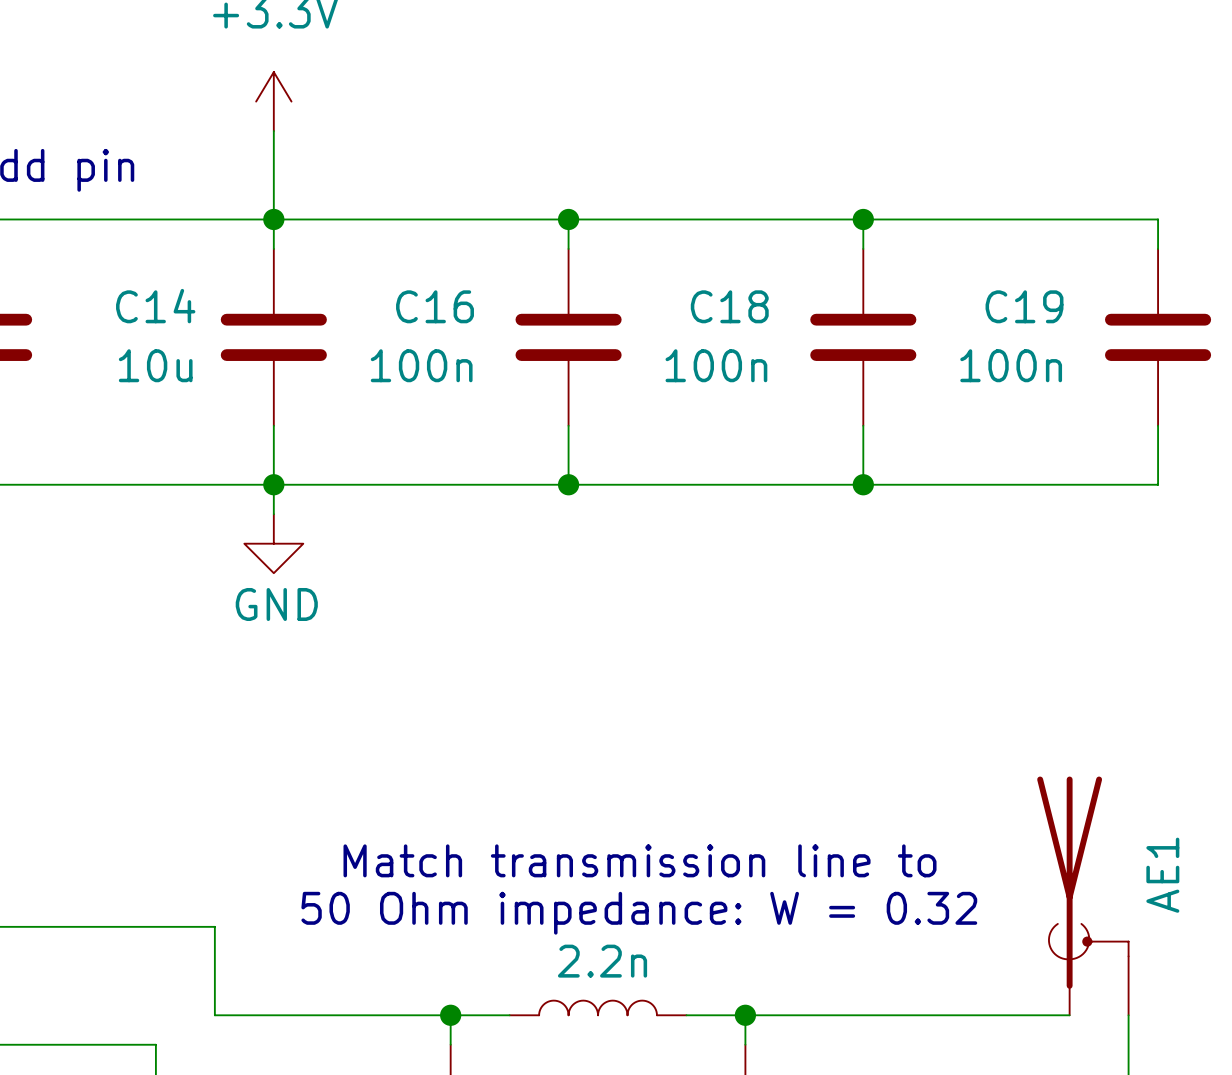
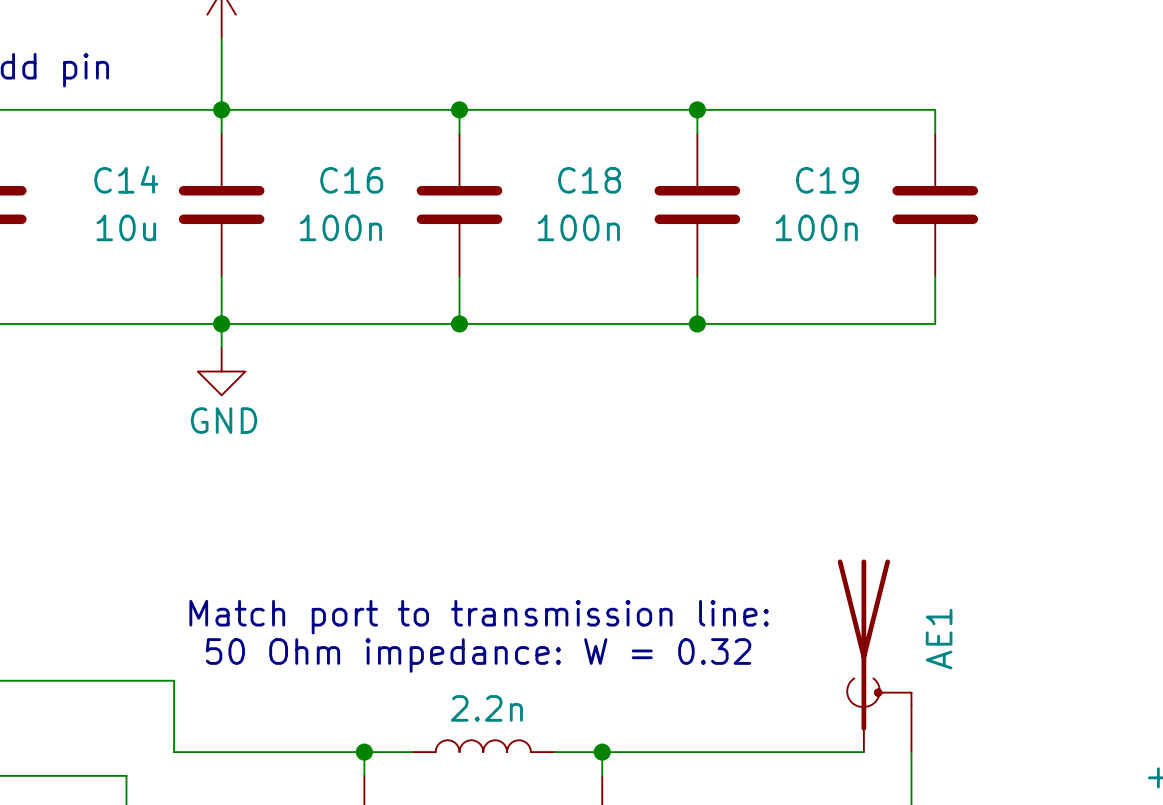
text: Match transmission line to (640, 860) -> Match port to transmission line: (479, 617)
text position: 50 Ohm impedance: W = 0.32 (639, 913) -> 50 Ohm impedance: W = 0.32 (478, 655)

